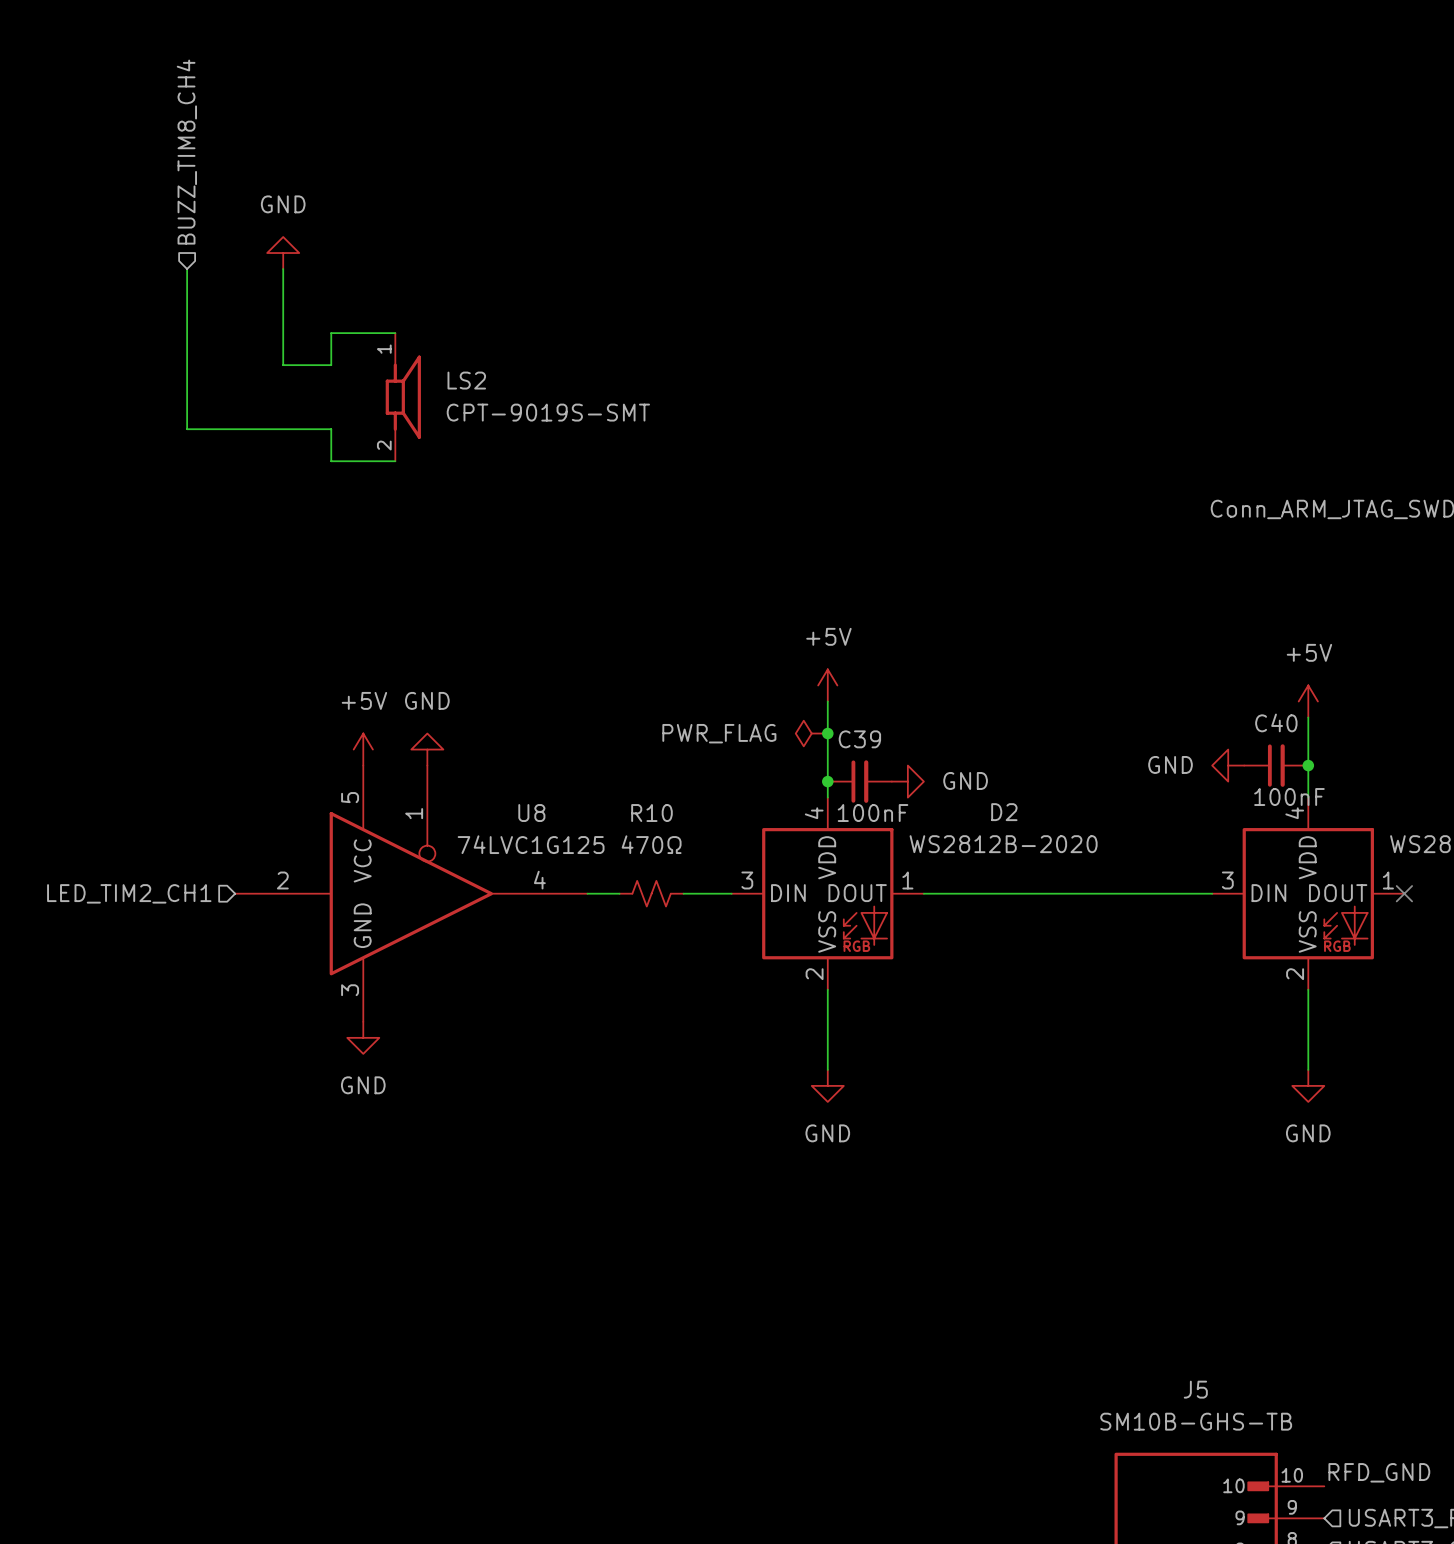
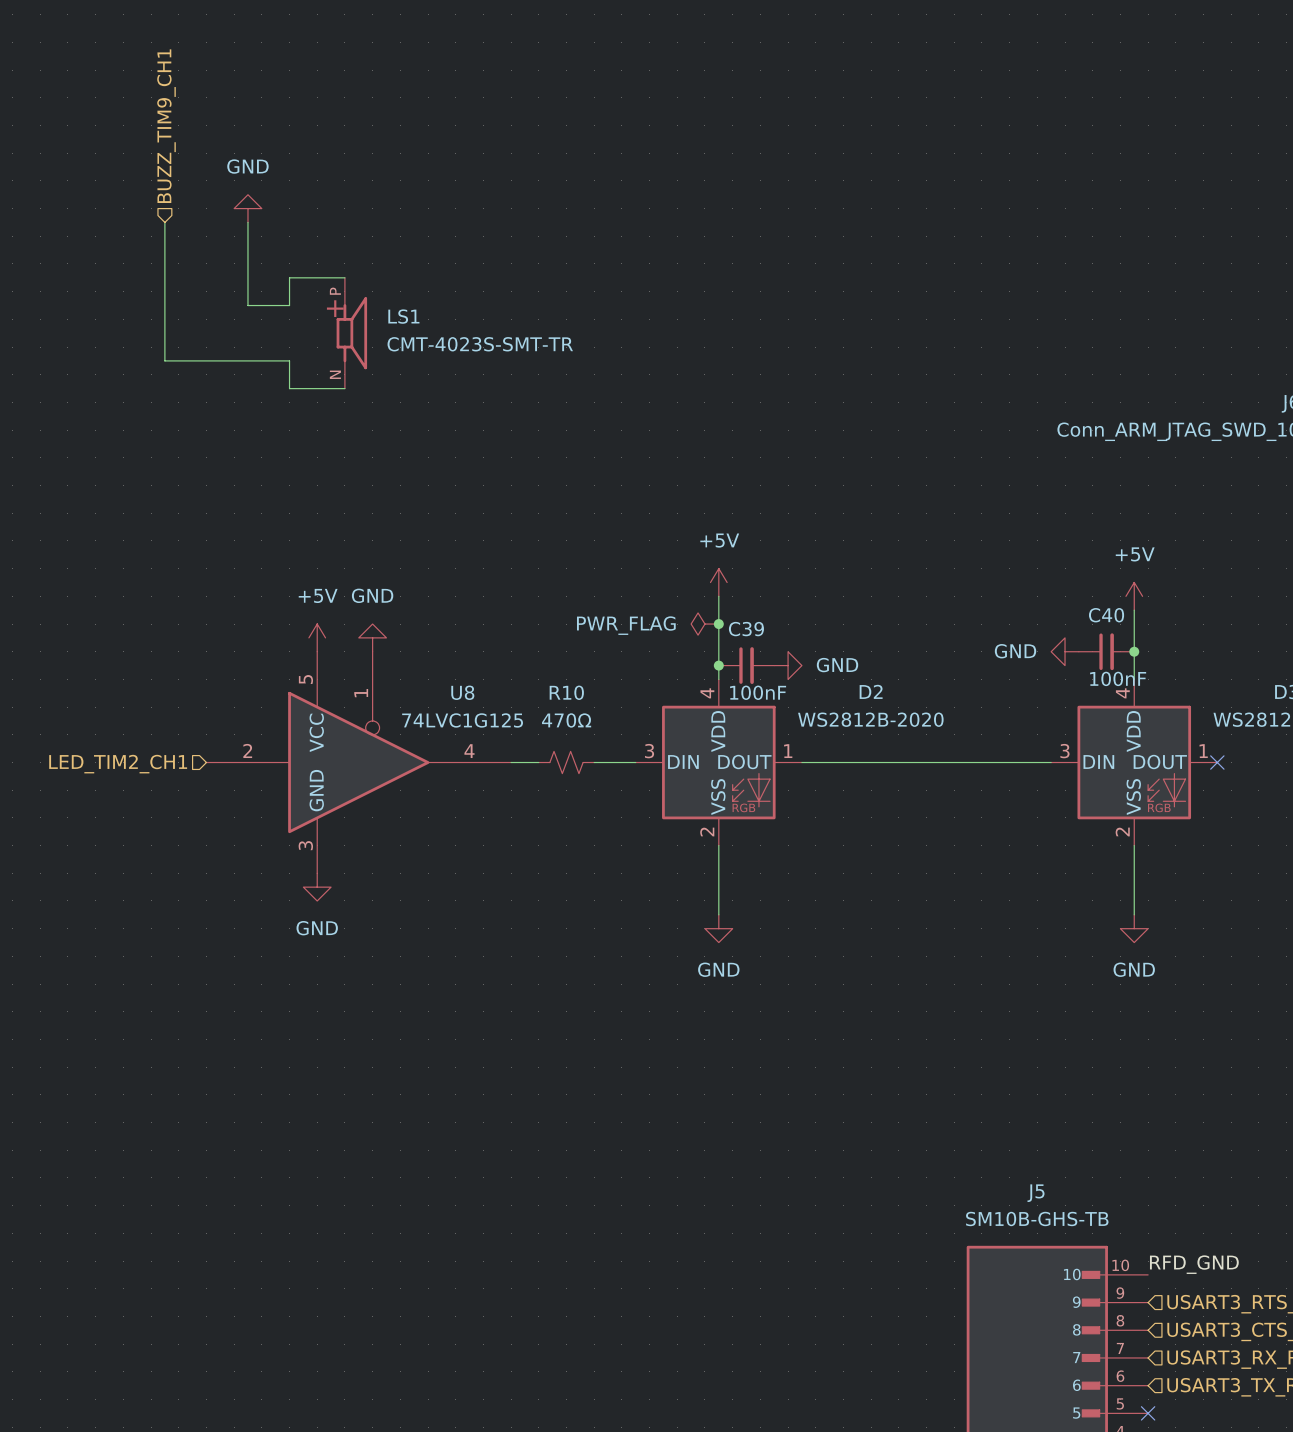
hierarchical label: BUZZ_TIM8_CH4 (186, 152) -> BUZZ_TIM9_CH1 (166, 126)
LS2 pin number: 1 (384, 349) -> P (335, 291)
LS2 text: none -> + (335, 308)
LS2 name: LS2 (466, 380) -> LS1 (403, 316)
LS2 value: CPT-9019S-SMT (548, 412) -> CMT-4023S-SMT-TR (480, 344)
LS2 pin number: 2 (384, 445) -> N (335, 374)

